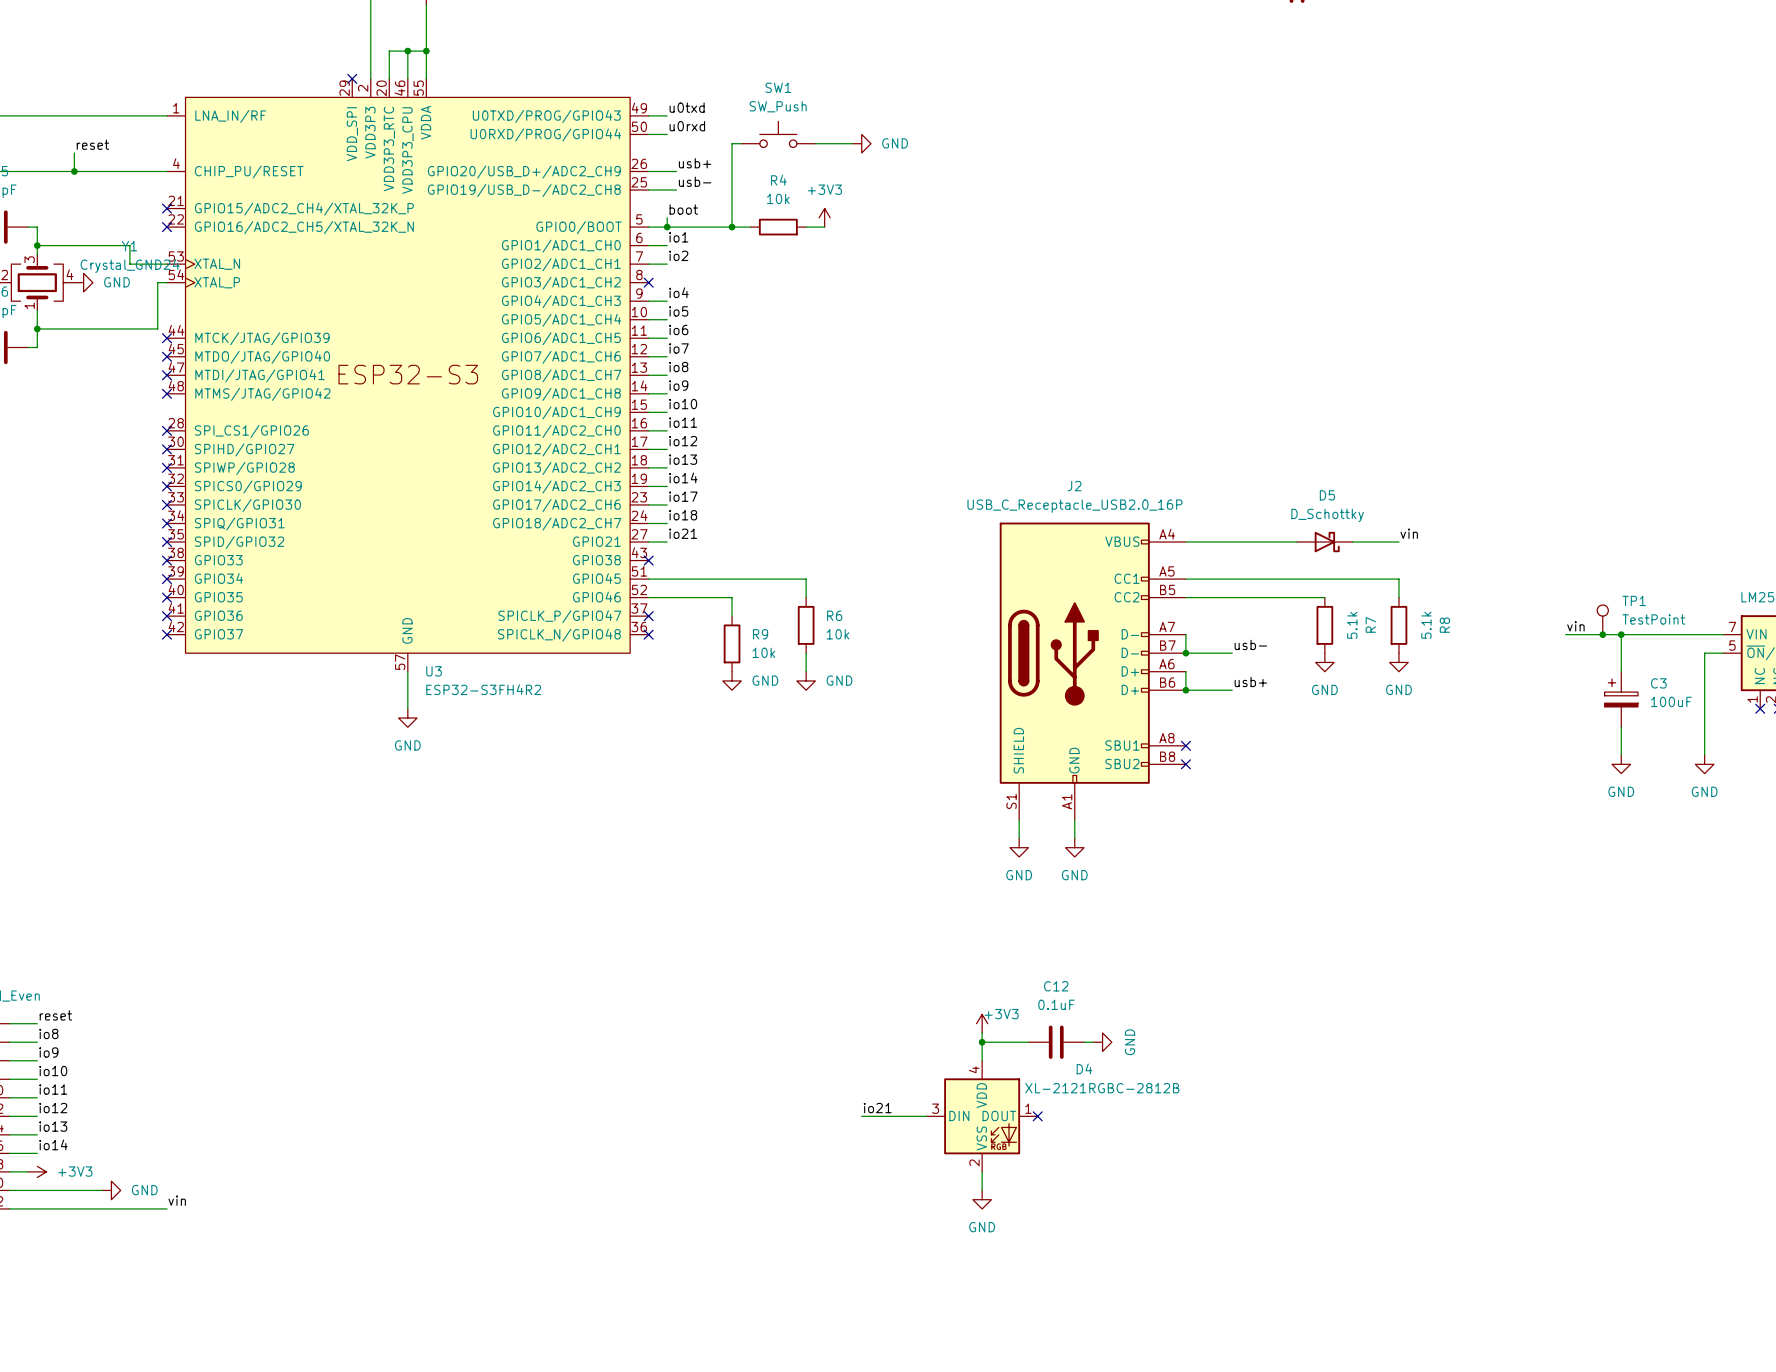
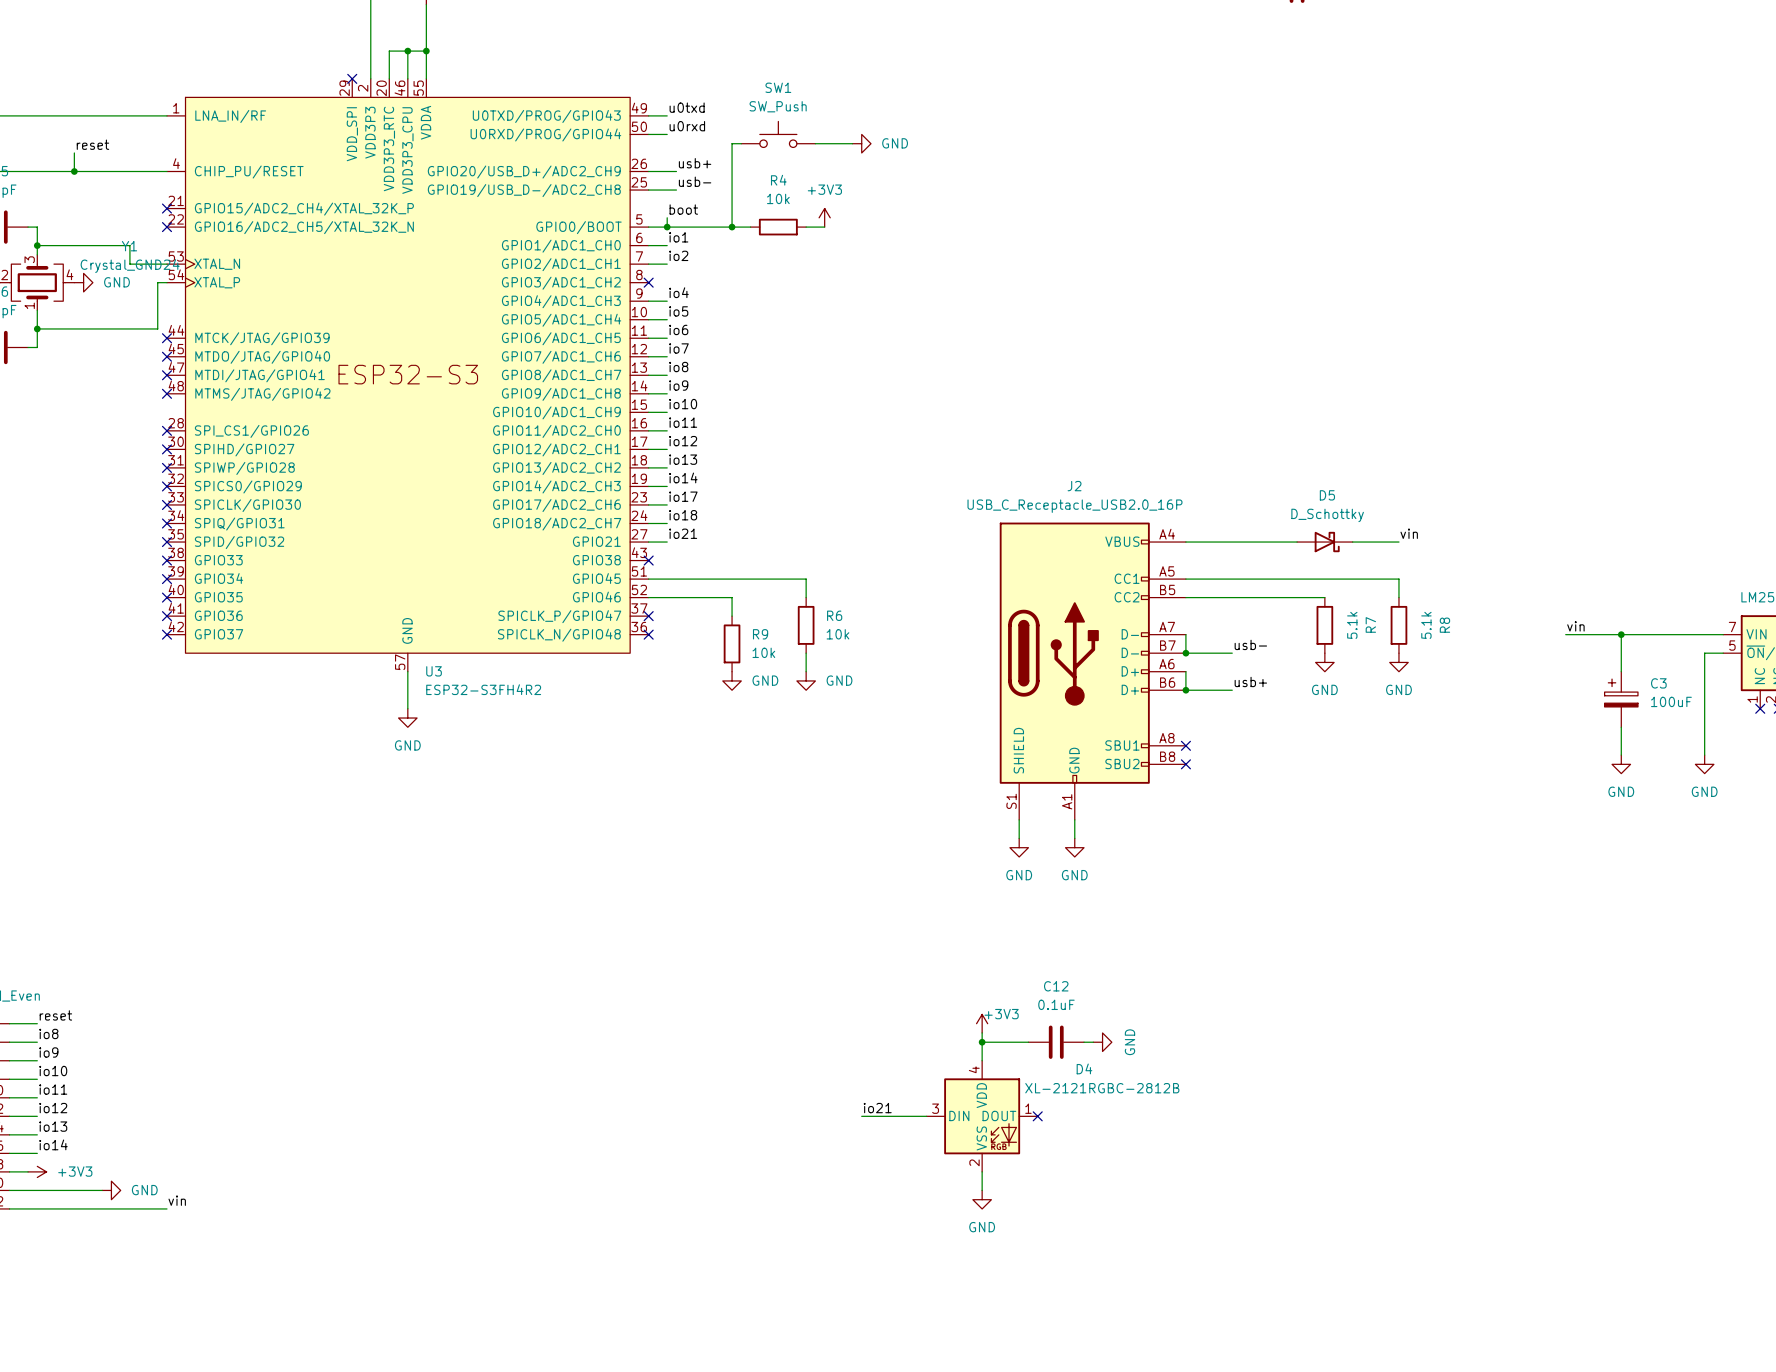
TP1: TestPoint (1602, 619) -> none
junction: (1602, 634) -> none

